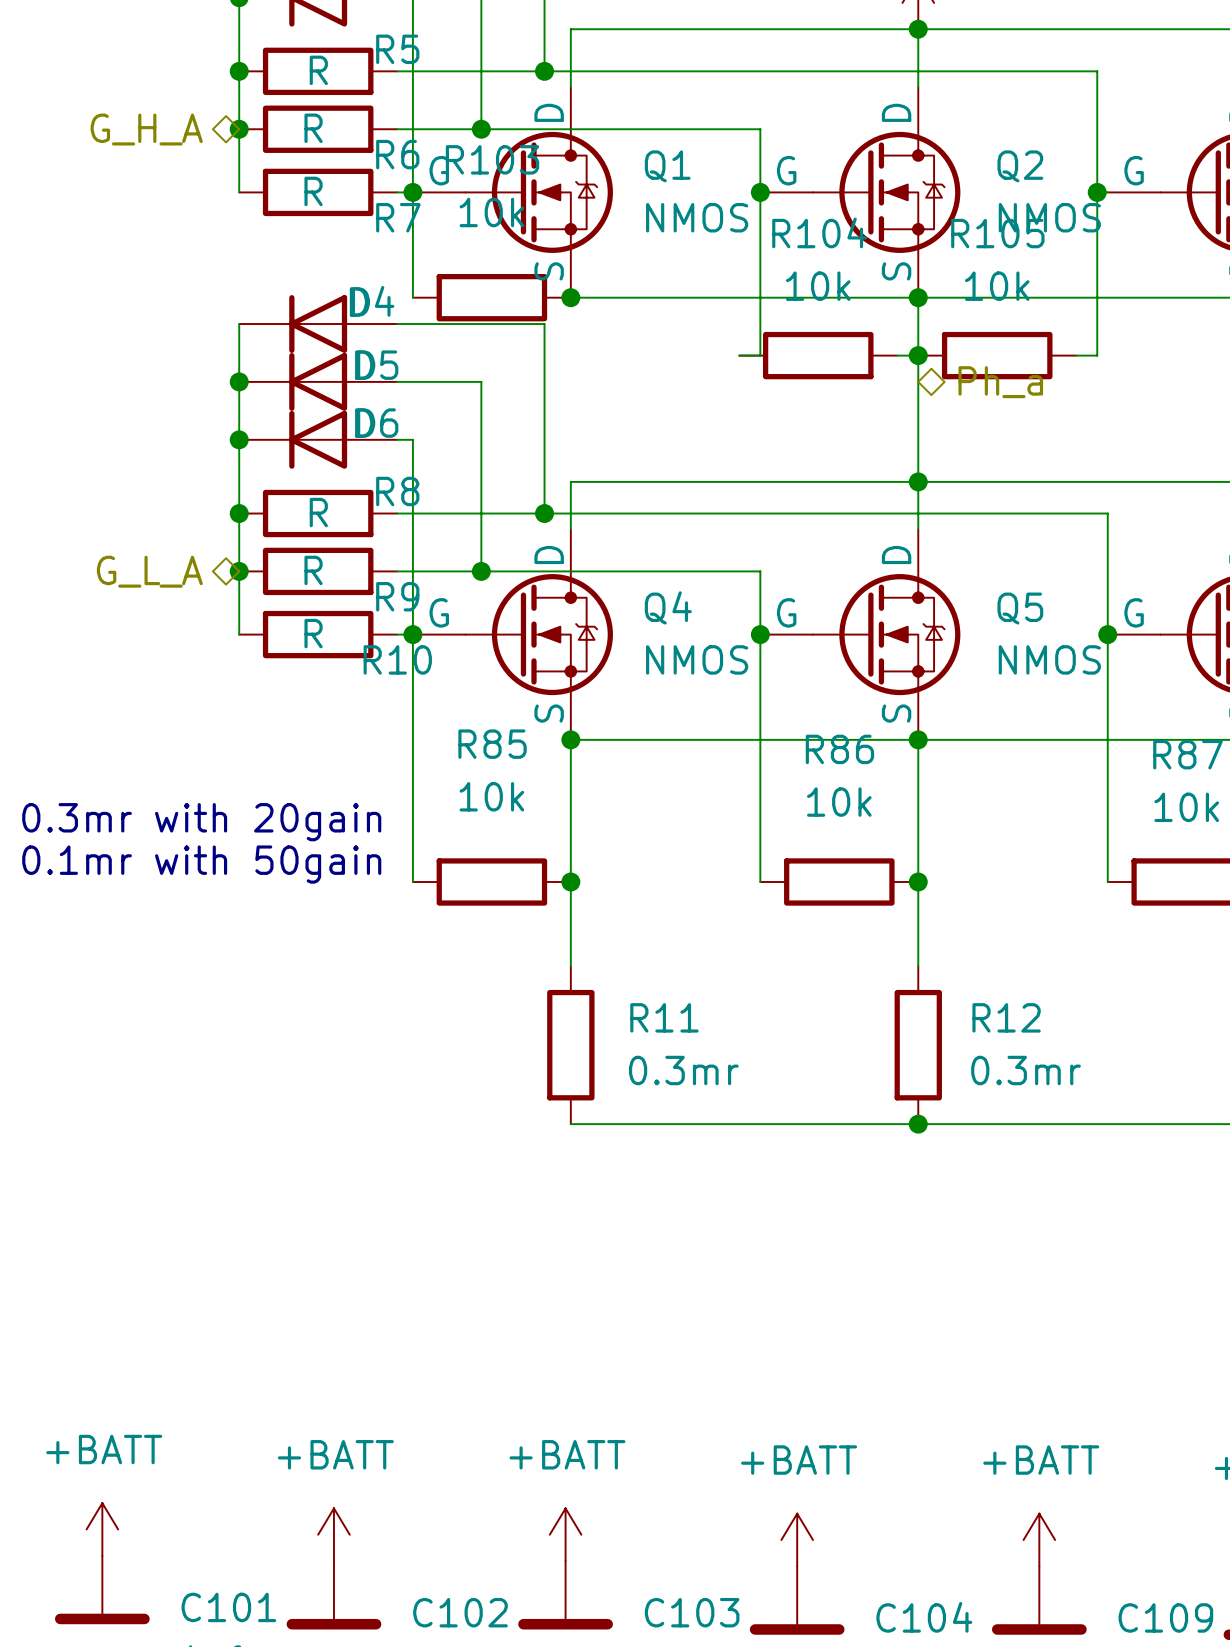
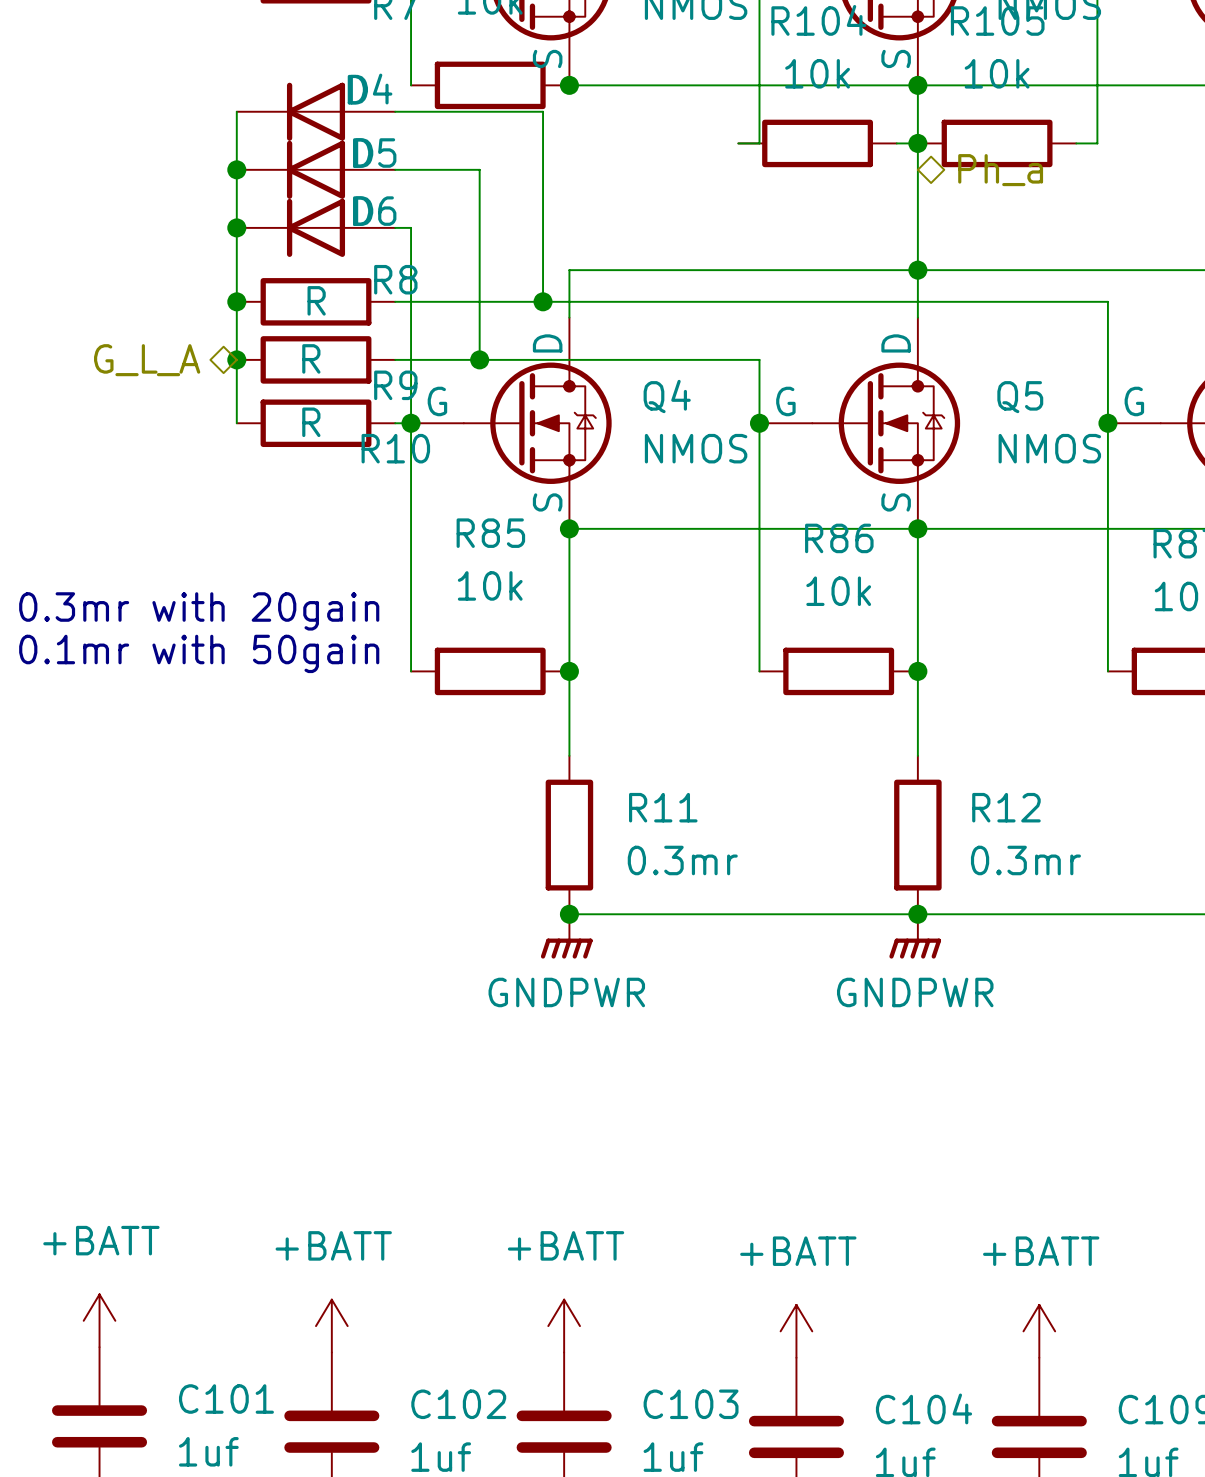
junction: none -> (569, 914)
power symbol: none -> GNDPWR (566, 936)
power symbol: none -> GNDPWR (915, 936)

